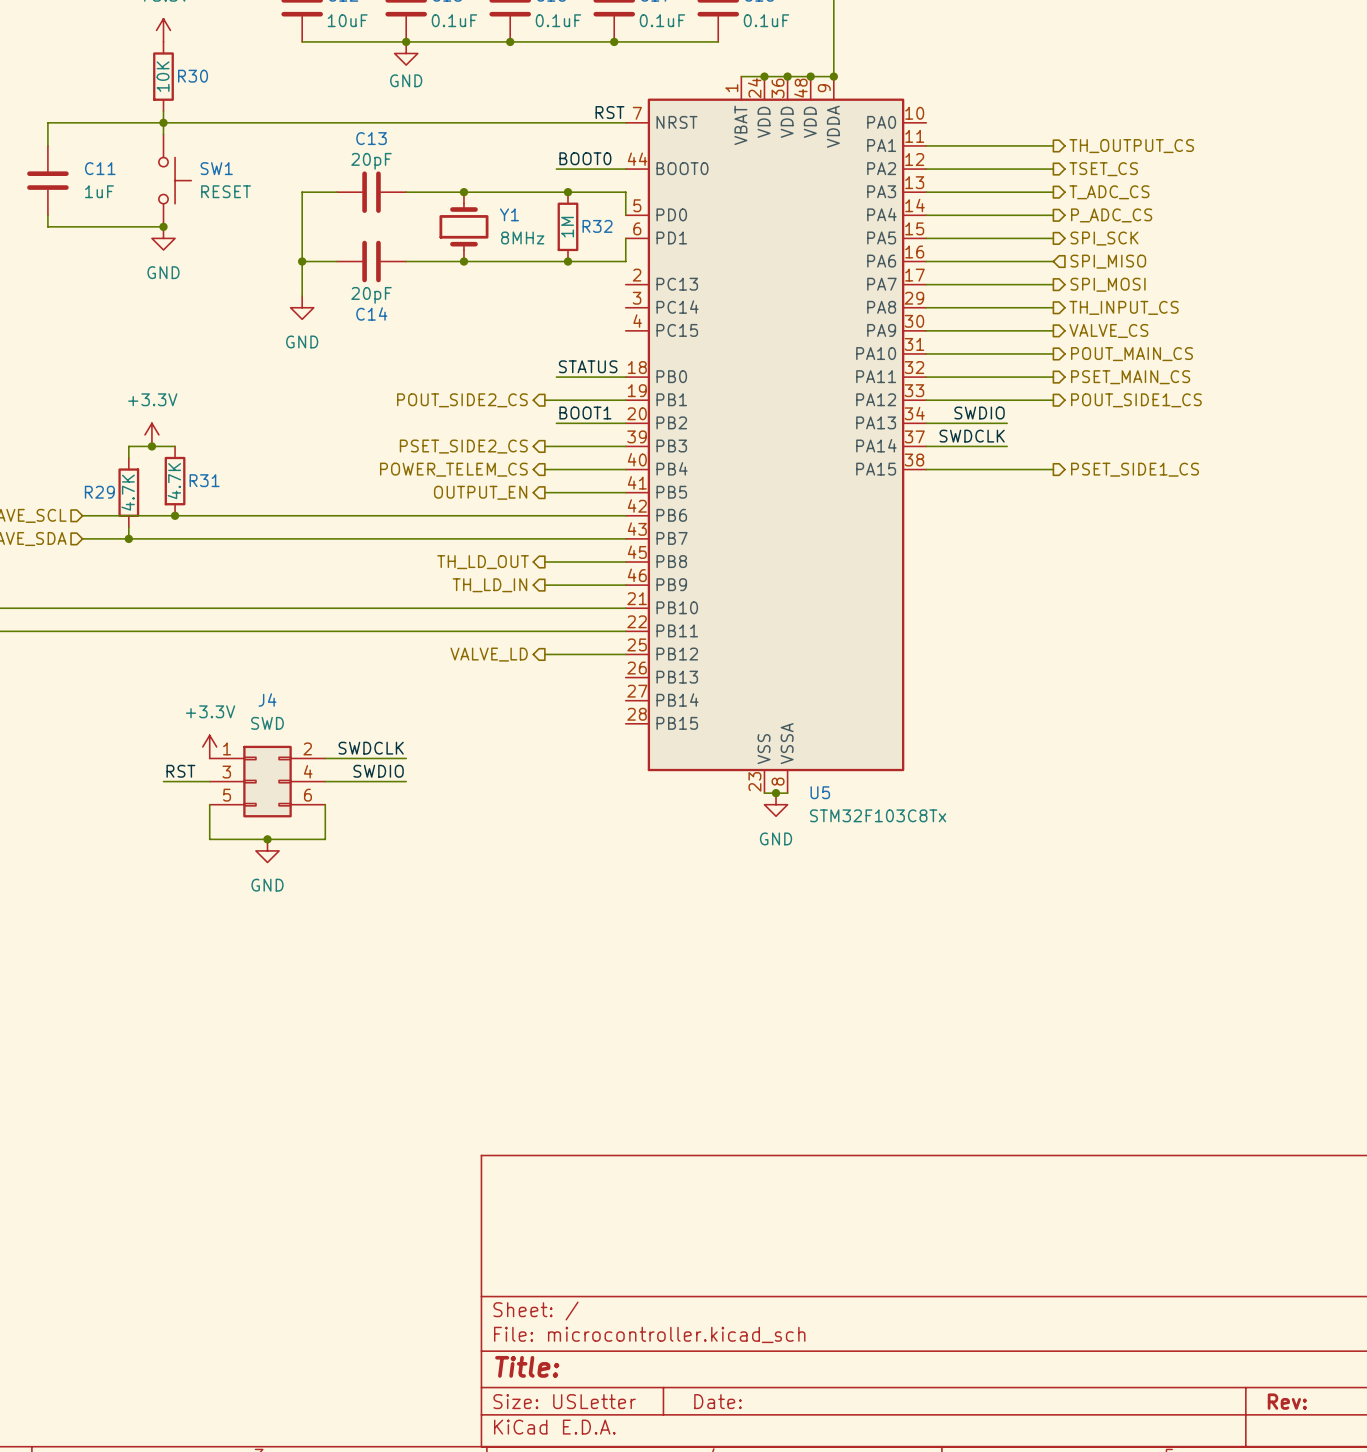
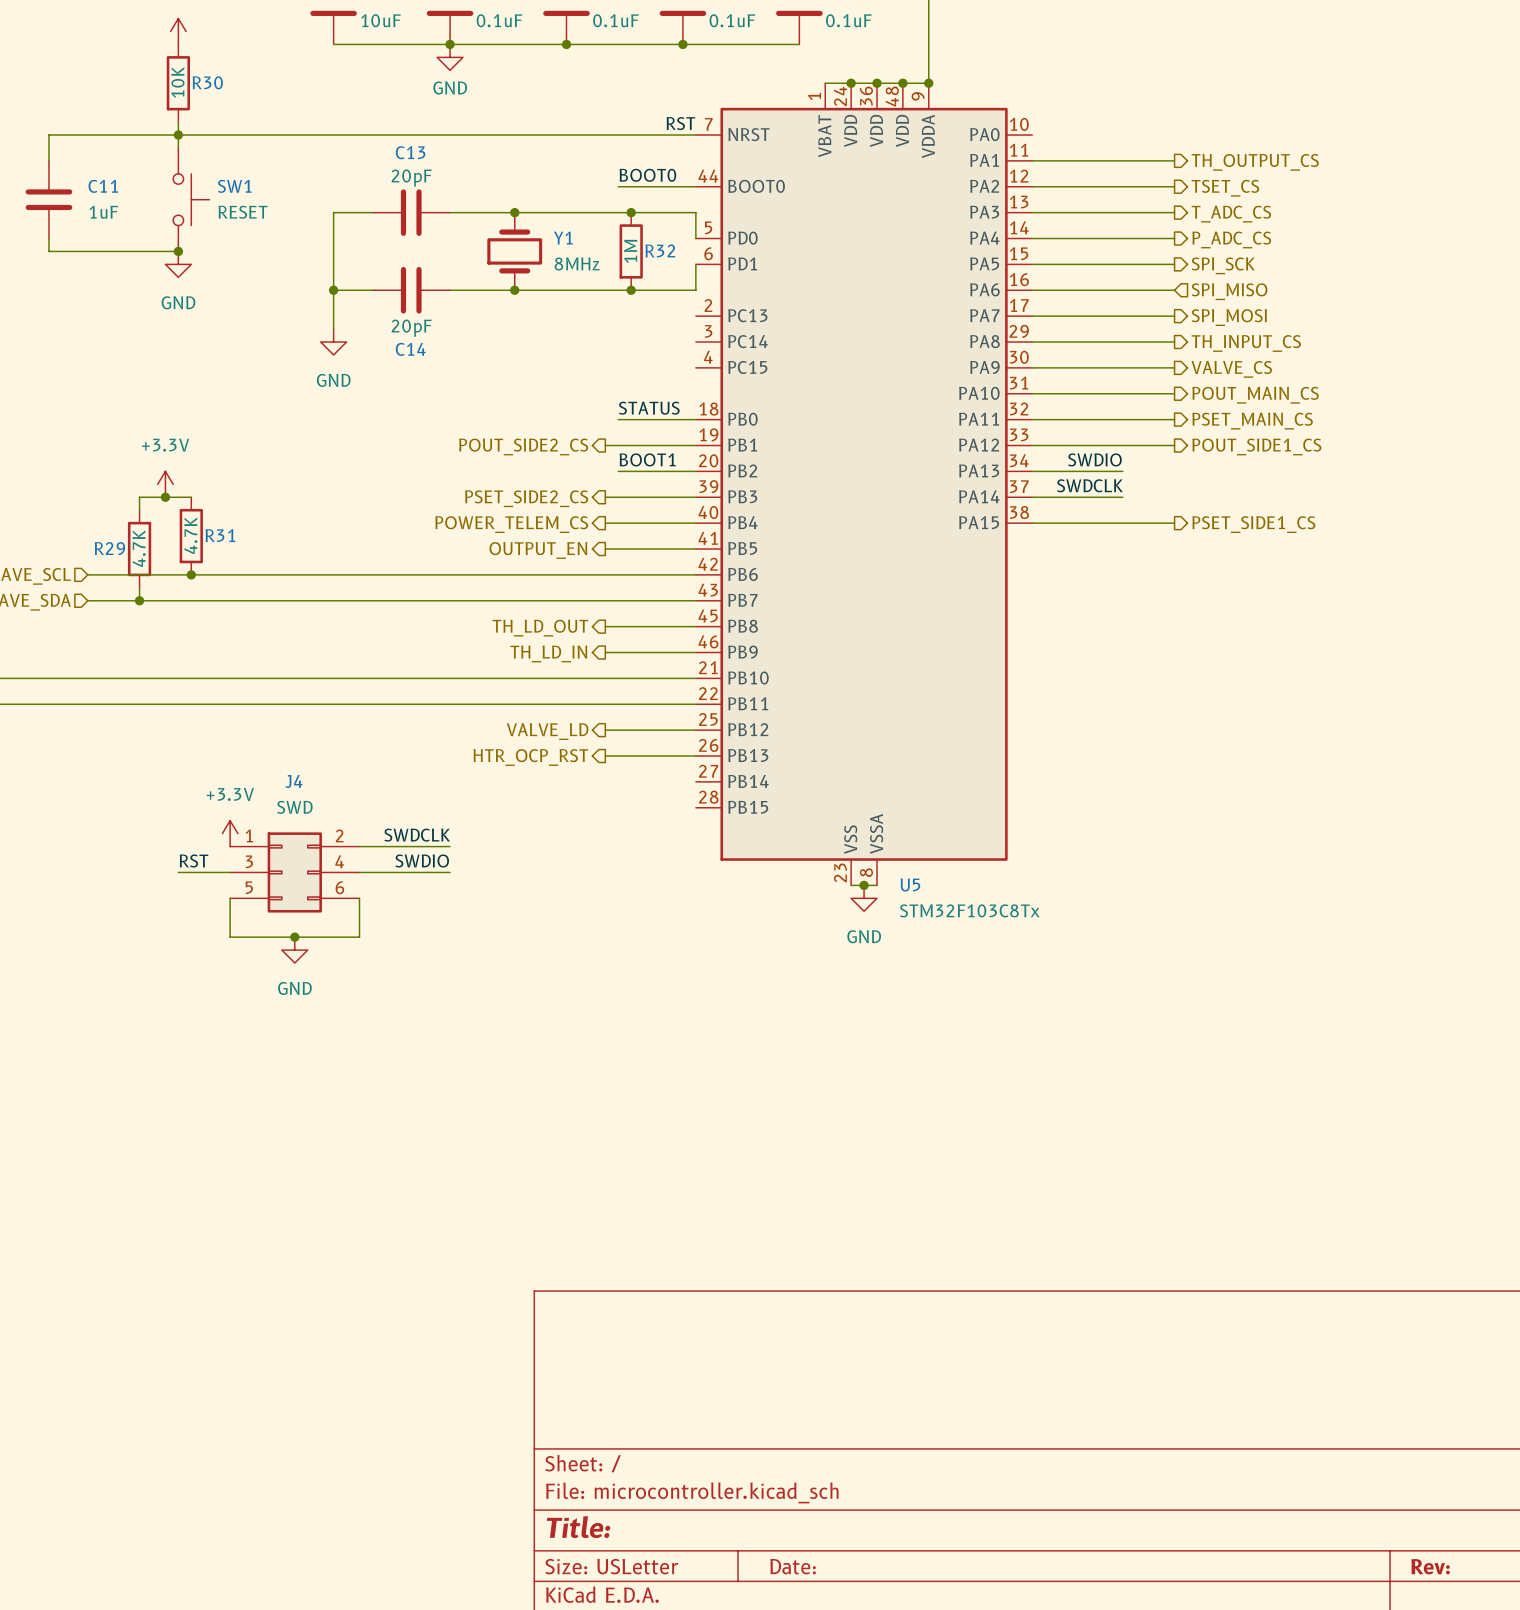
hierarchical label: none -> HTR_OCP_RST (530, 757)
wire: none -> (605, 756) (695, 756)

